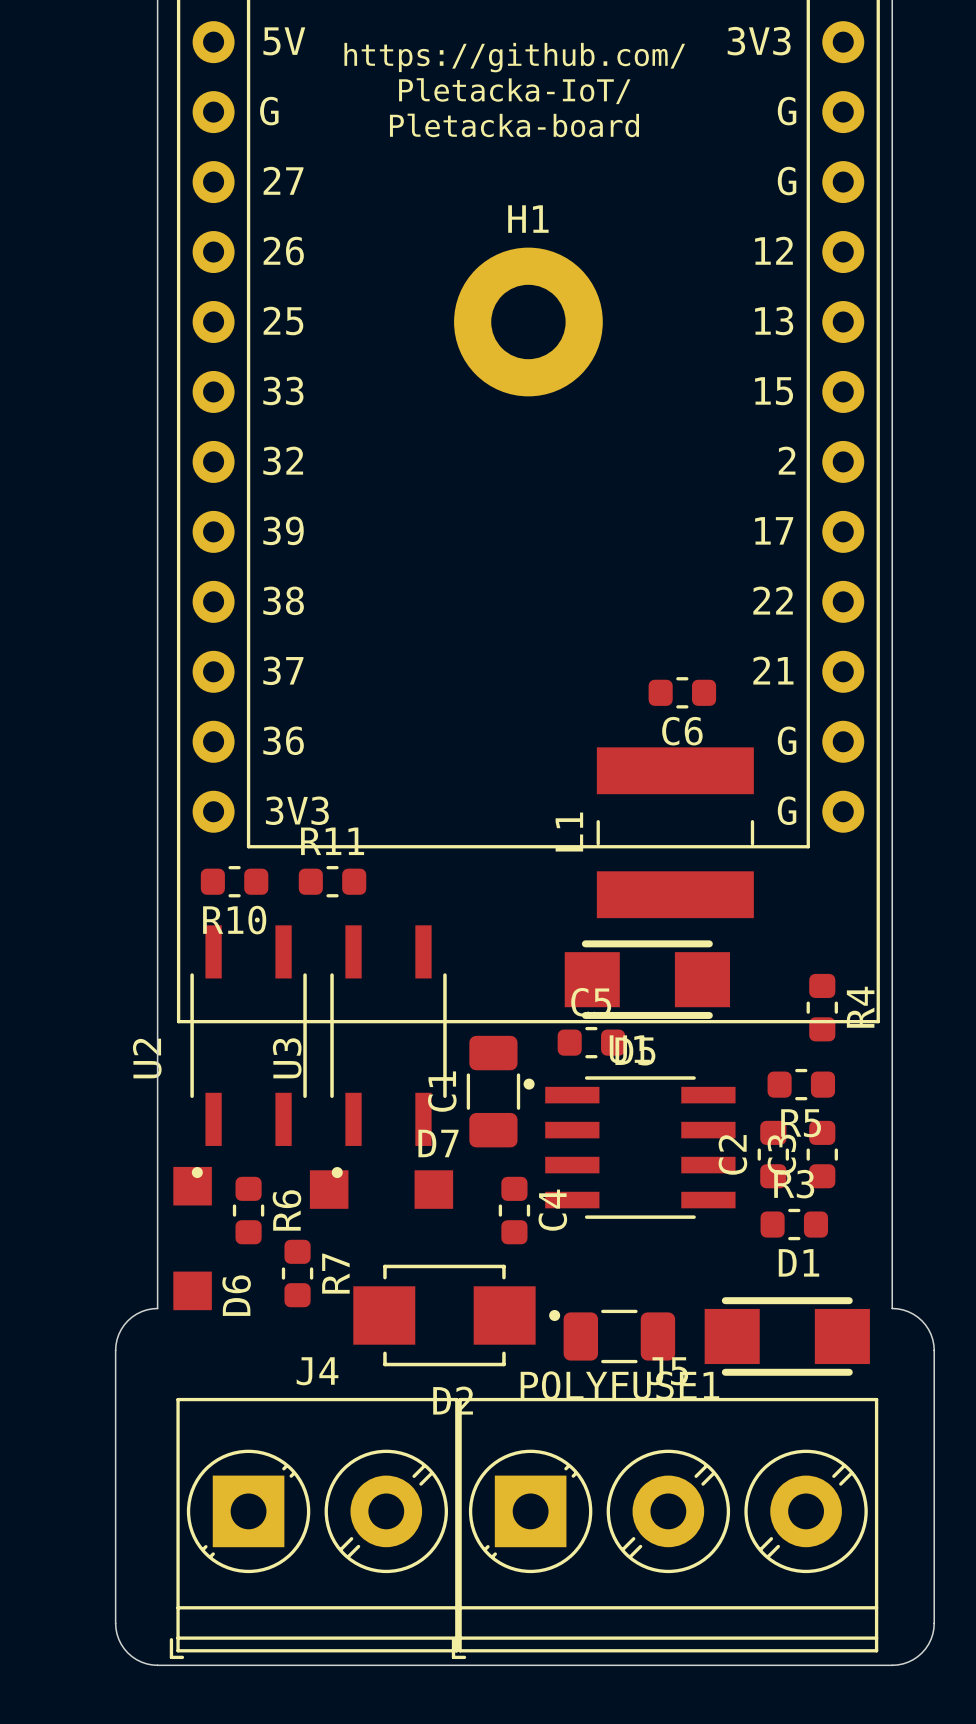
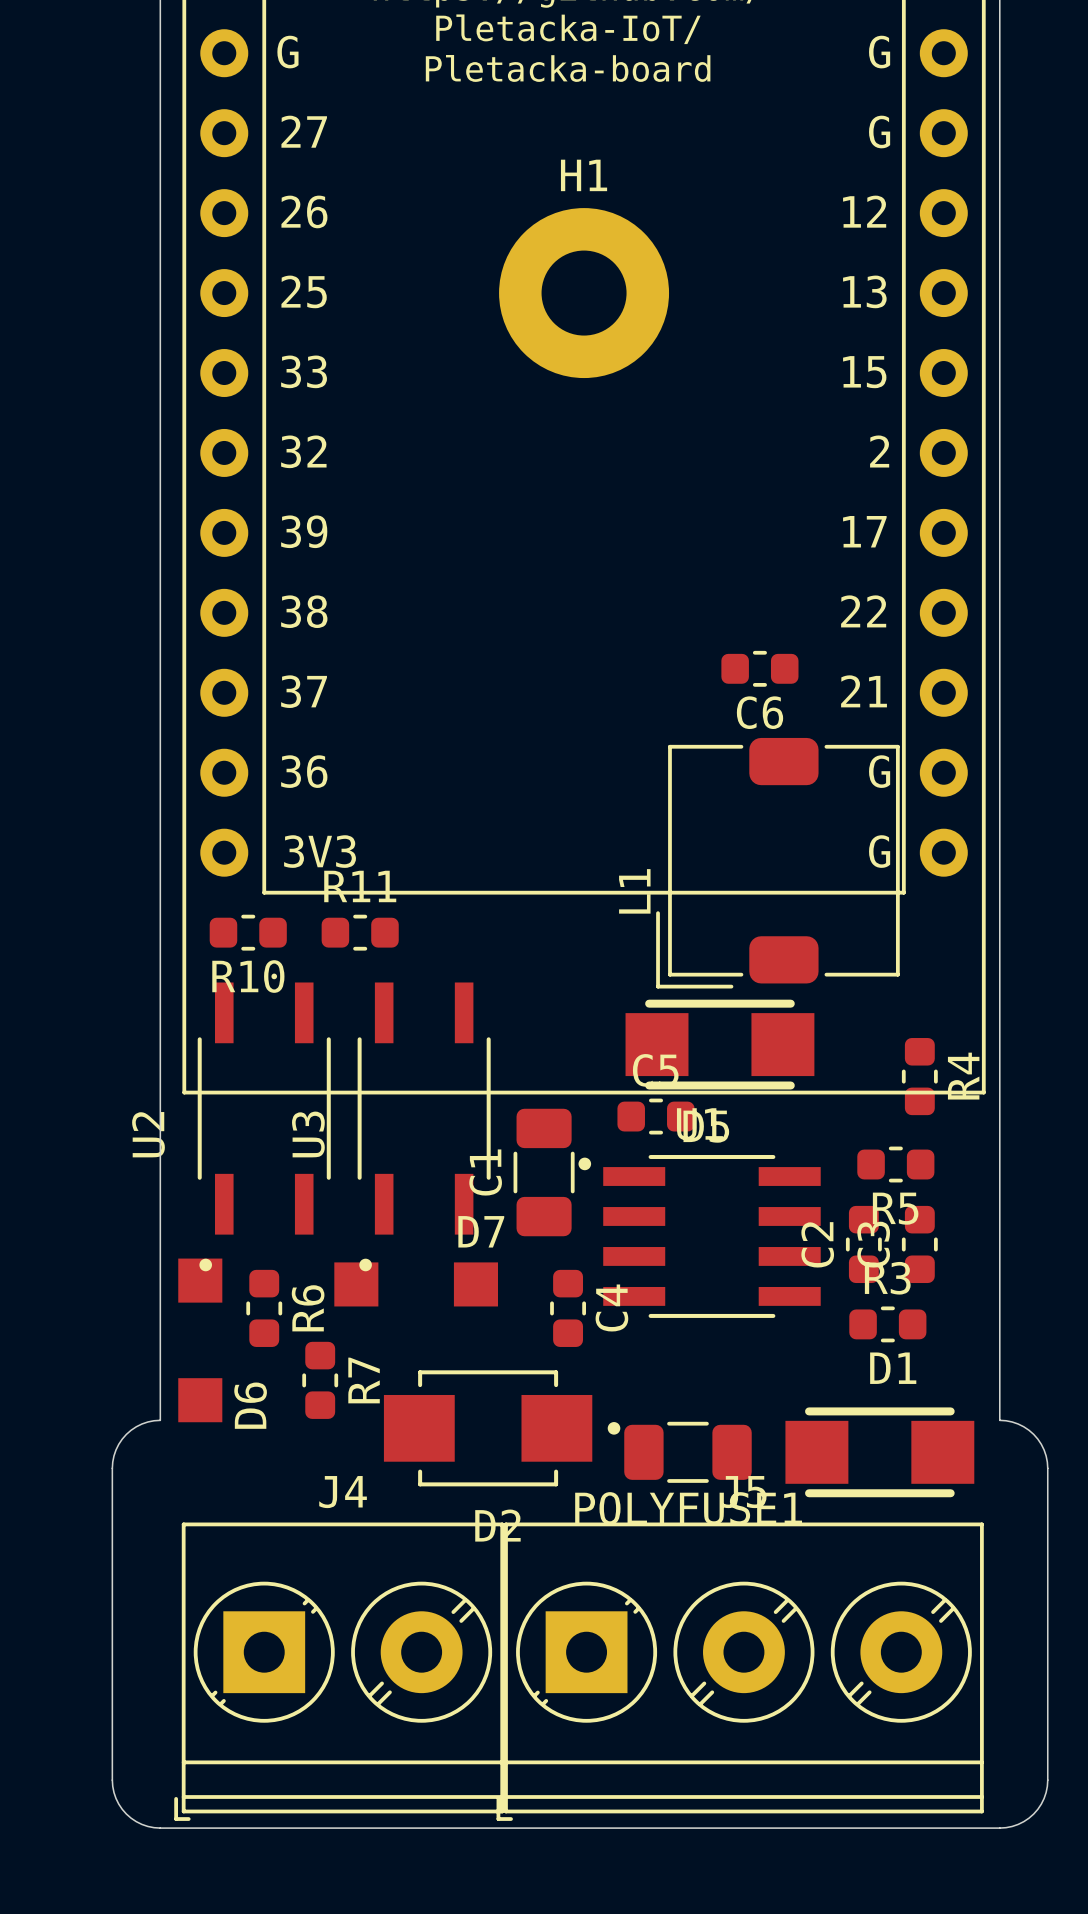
C6 position: (682, 692) -> (759, 668)
L1 footprint: [596, 747, 755, 919] -> [656, 737, 900, 989]

